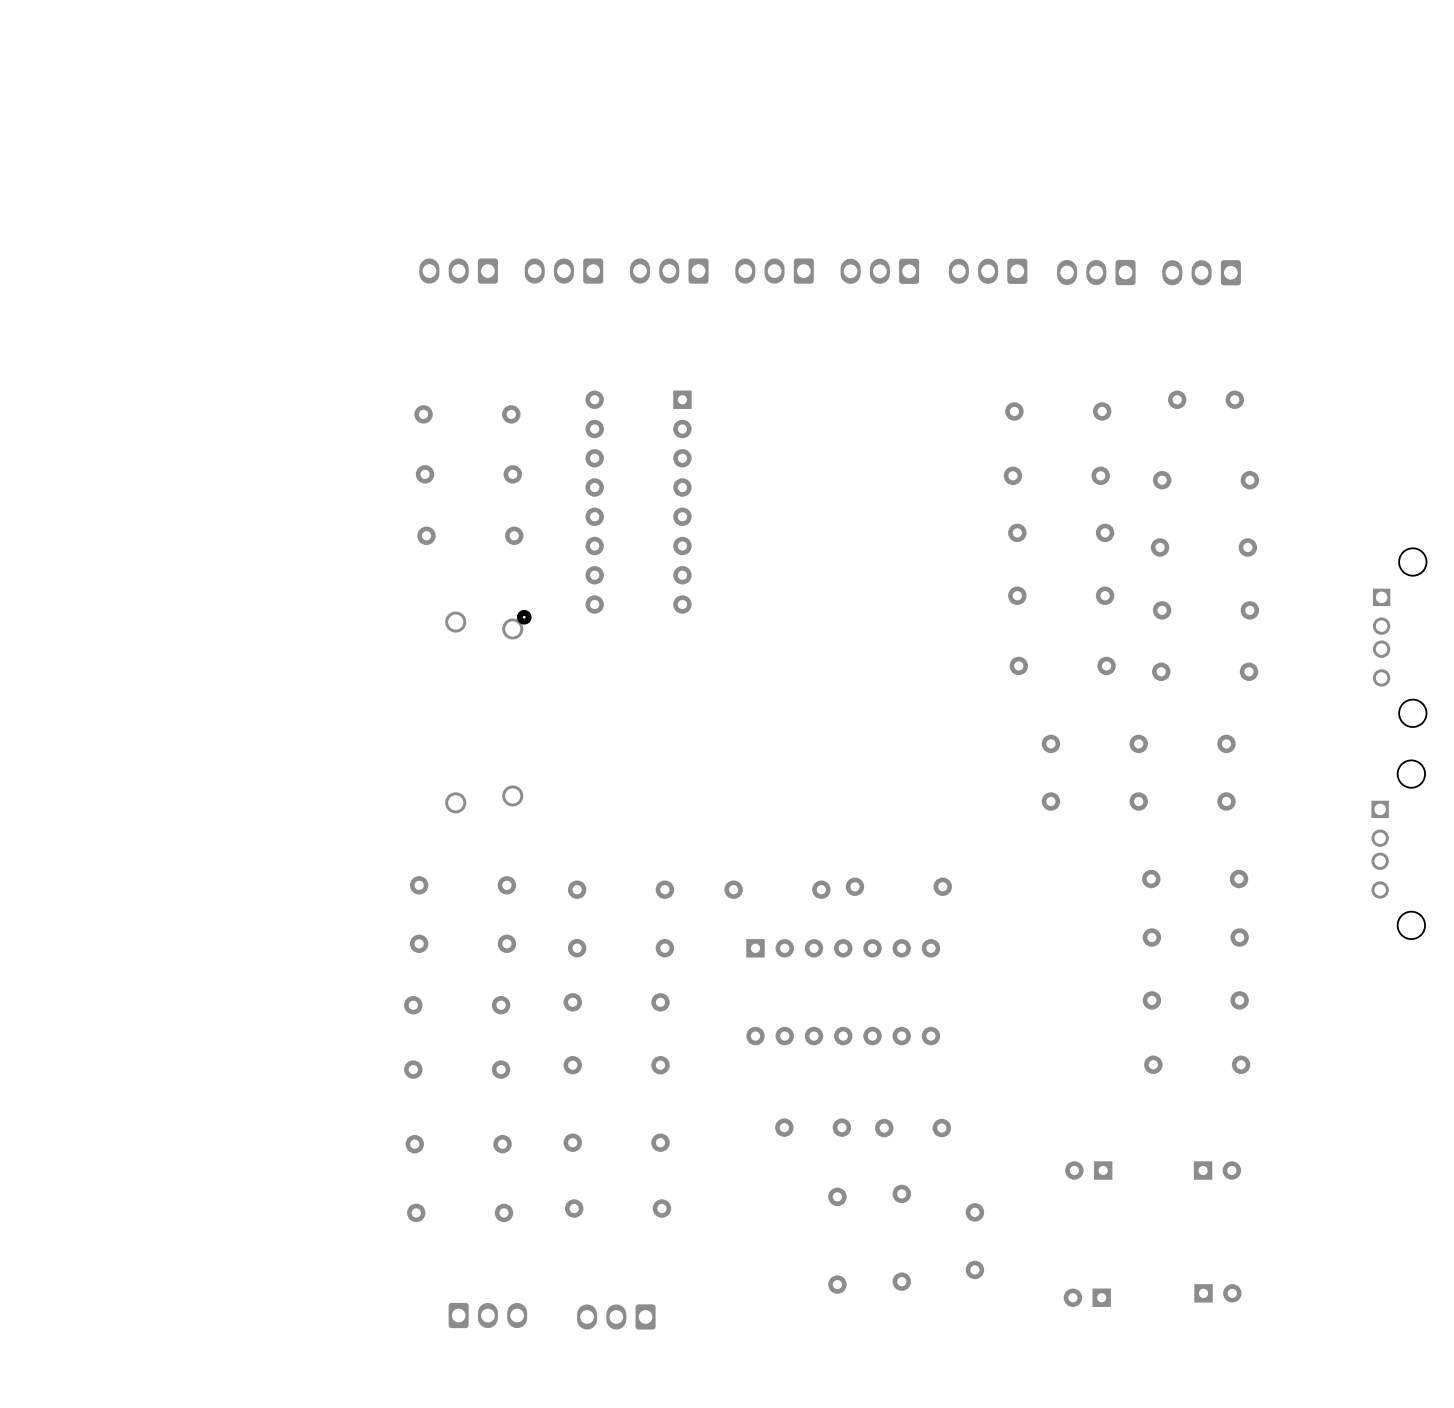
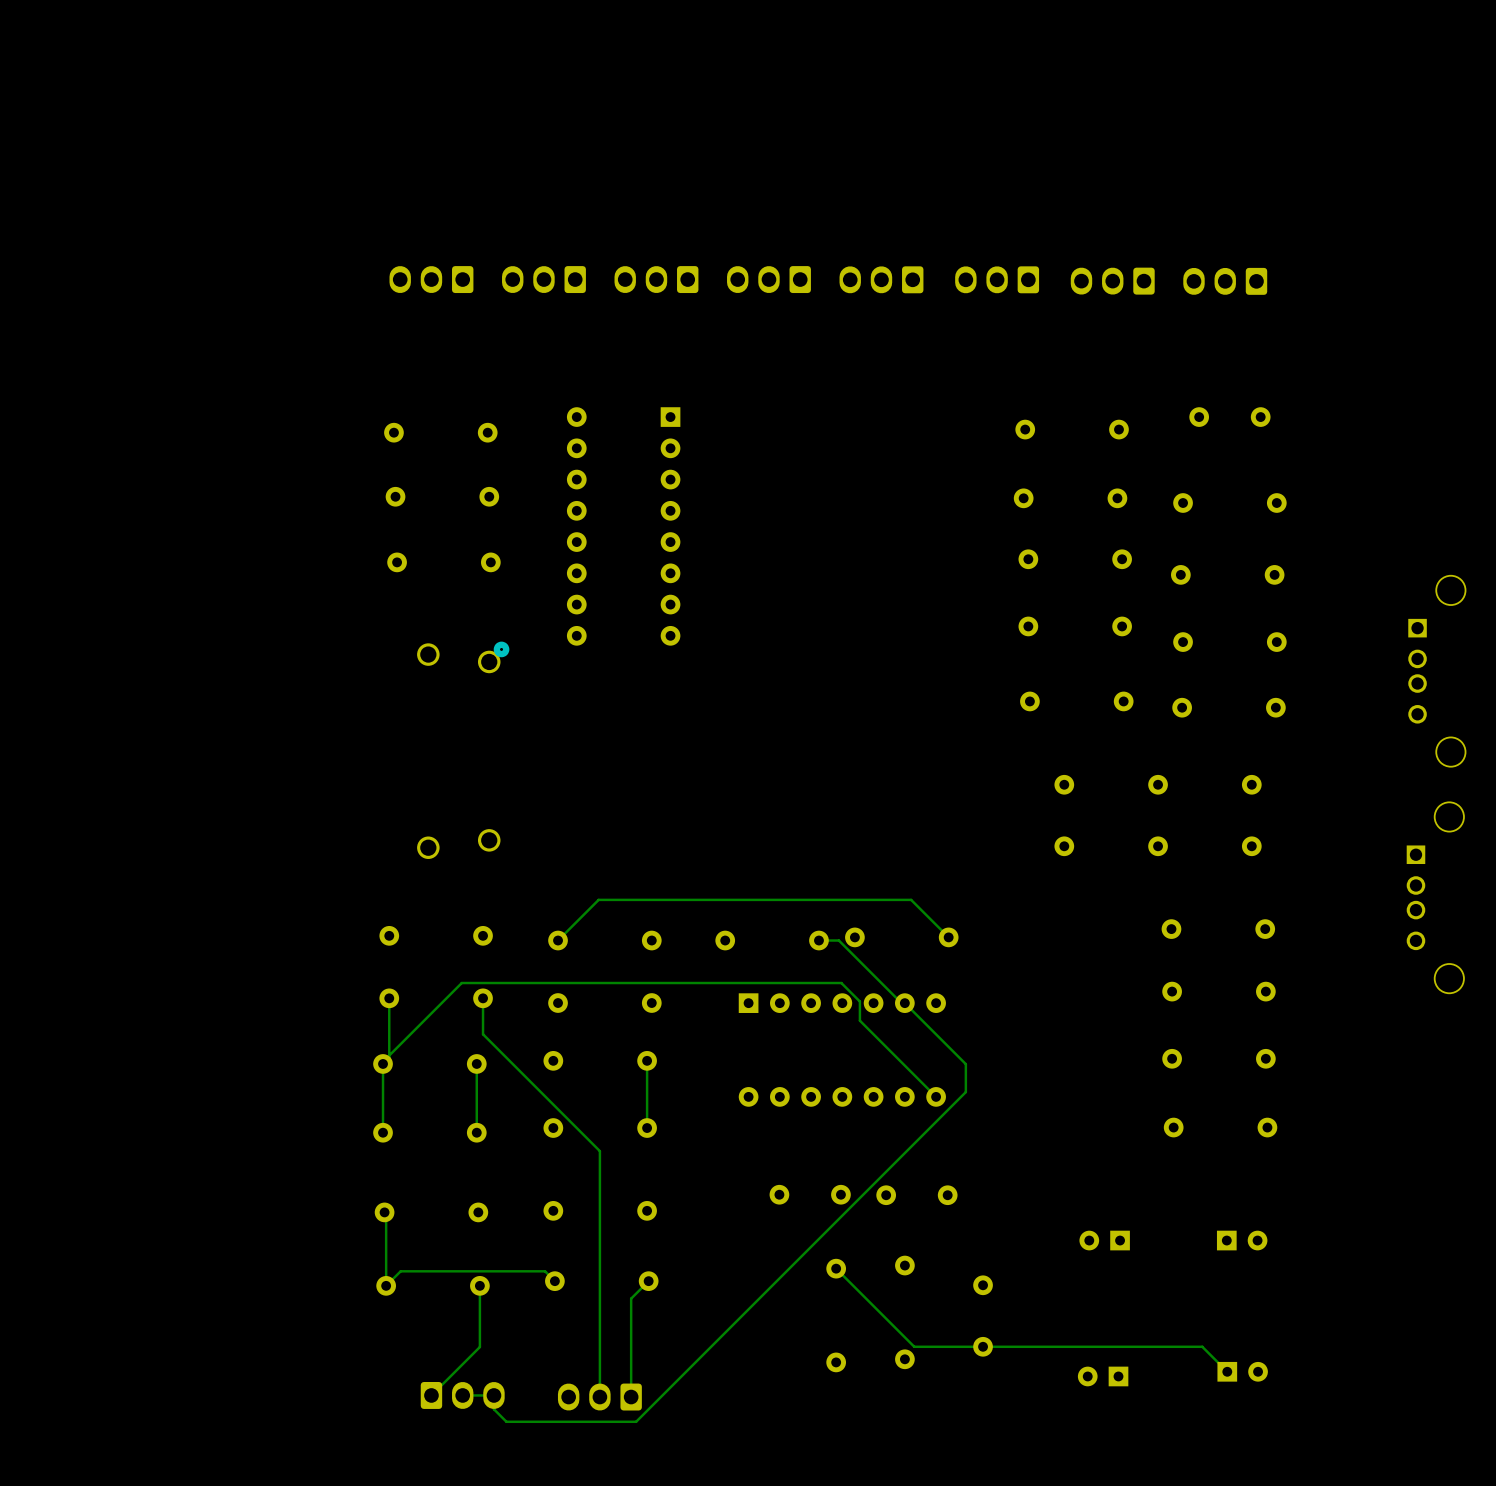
track: none -> (948, 937) (911, 899) (598, 899) (558, 940)
track: none -> (818, 940) (838, 940) (965, 1064) (965, 1092) (636, 1421) (506, 1421) (493, 1409) (493, 1395) (462, 1395)
track: none -> (389, 998) (389, 1057) (383, 1063)
track: none -> (483, 998) (483, 1034) (599, 1151) (599, 1397)
track: none -> (647, 1060) (647, 1132)
track: none -> (383, 1063) (383, 1132)
track: none -> (383, 1063) (381, 1063) (461, 983) (841, 983) (859, 1001) (859, 1020) (936, 1096)
track: none -> (476, 1063) (476, 1132)
track: none -> (384, 1212) (386, 1213) (386, 1285) (400, 1271) (545, 1271) (554, 1281)
track: none -> (836, 1268) (914, 1346) (1202, 1346) (1227, 1371)
track: none -> (647, 1279) (648, 1281) (631, 1298) (631, 1397)
track: none -> (479, 1285) (479, 1347) (431, 1395)

